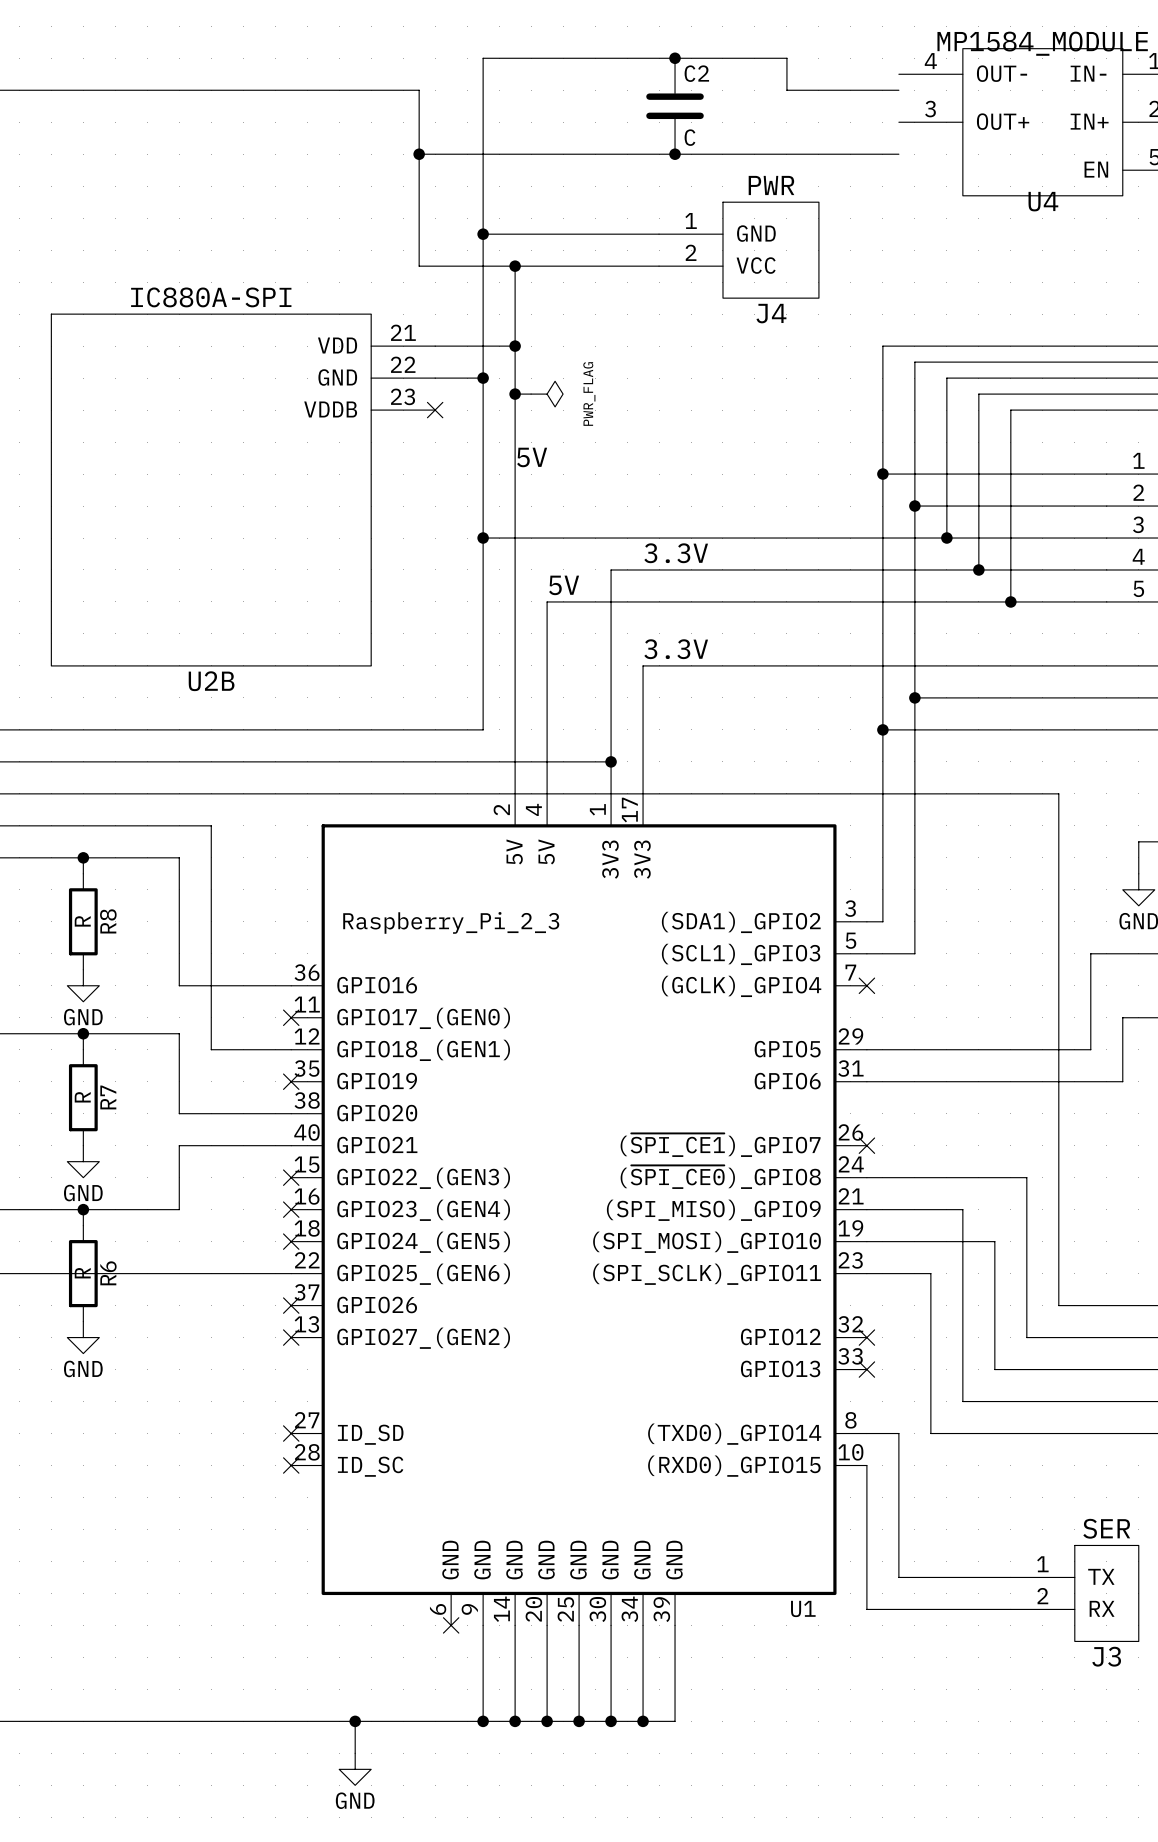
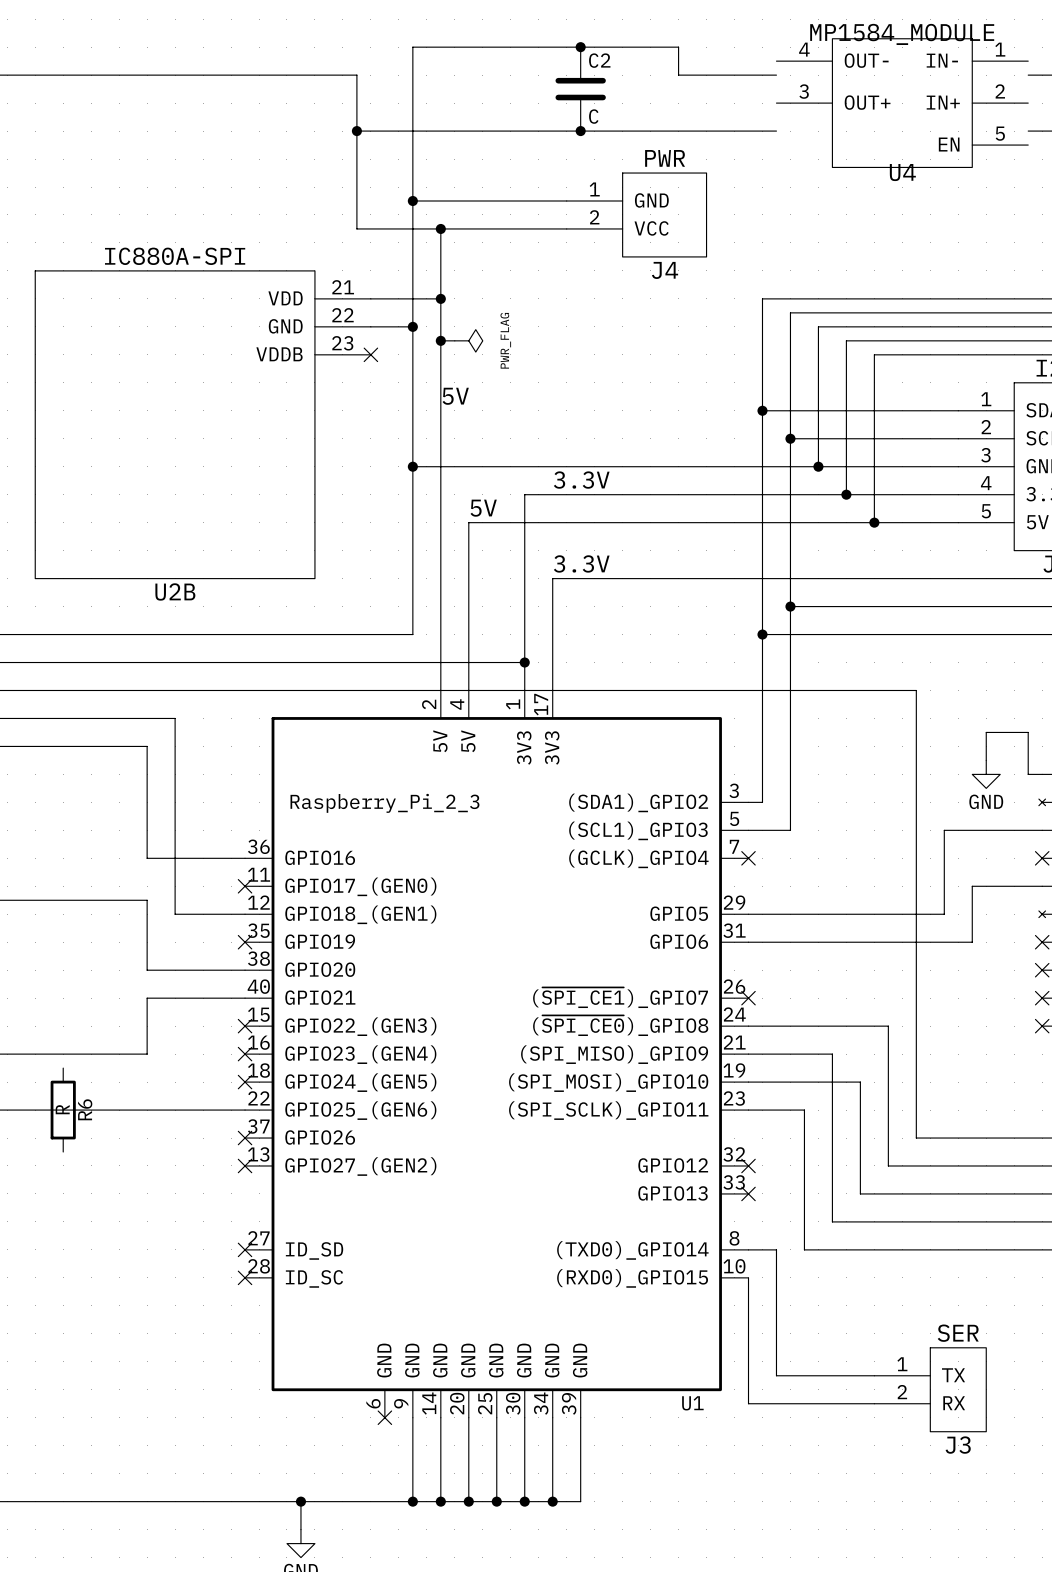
wire: (83, 857) (83, 873) -> none
junction: (83, 857) -> none
R8: R (83, 921) -> none
power symbol: GND (83, 985) -> none
wire: (83, 1033) (83, 1049) -> none
junction: (83, 1033) -> none
R7: R (83, 1097) -> none
power symbol: GND (83, 1161) -> none
wire: (83, 1209) (83, 1225) -> none
junction: (83, 1209) -> none
power symbol: GND (83, 1337) -> none

